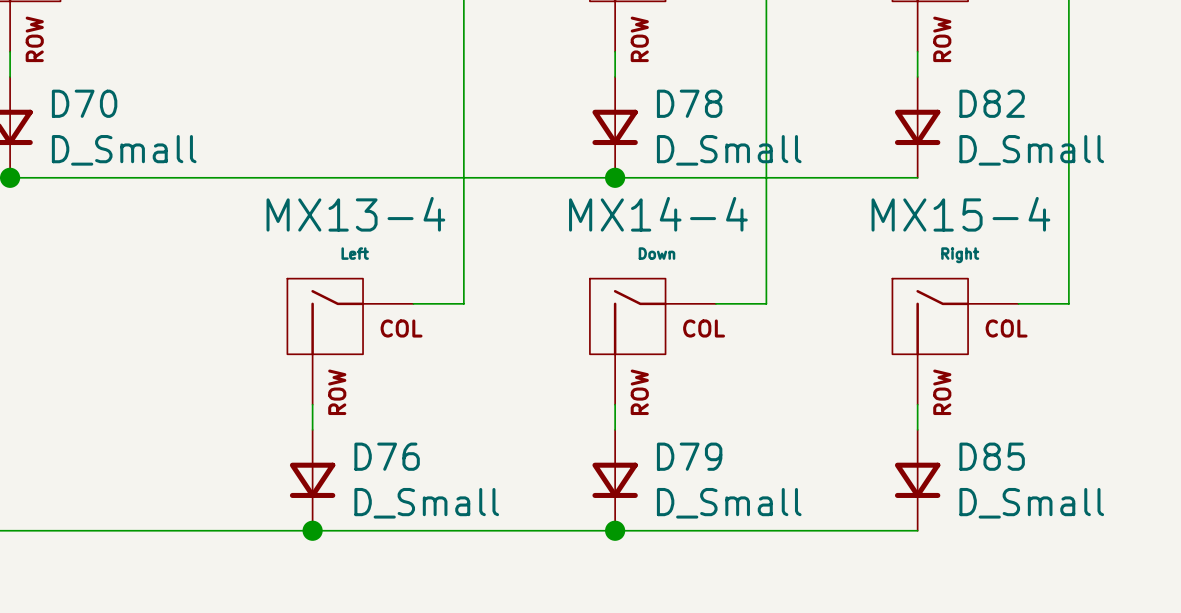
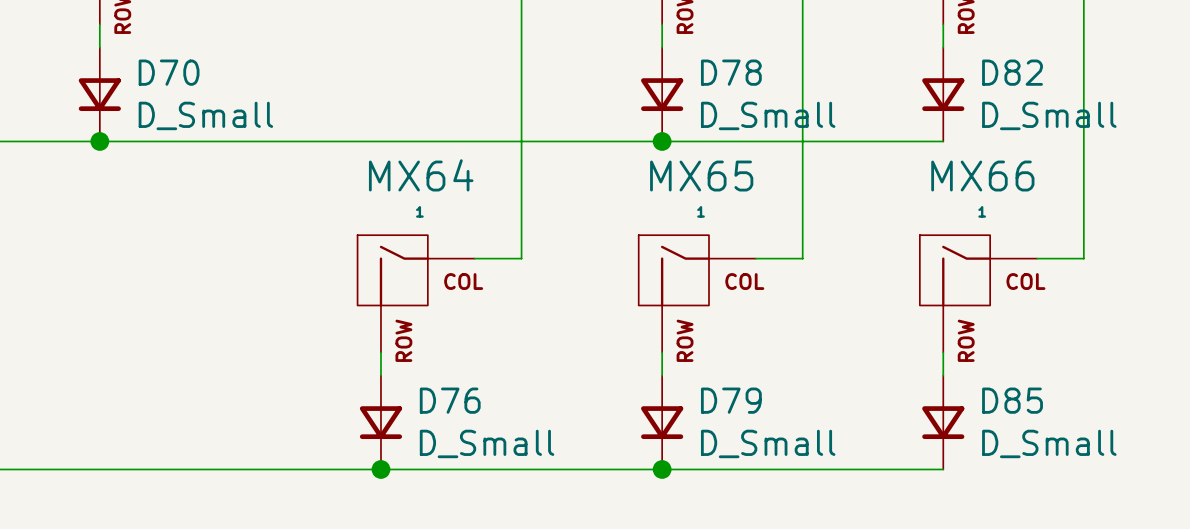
MX13-4 name: MX13-4 (355, 214) -> MX64 (421, 175)
MX14-4 name: MX14-4 (658, 214) -> MX65 (701, 176)
MX15-4 name: MX15-4 (960, 214) -> MX66 (982, 176)
MX13-4 value: Left (355, 253) -> 1 (419, 211)
MX14-4 value: Down (656, 253) -> 1 (701, 211)
MX15-4 value: Right (960, 255) -> 1 (982, 211)

